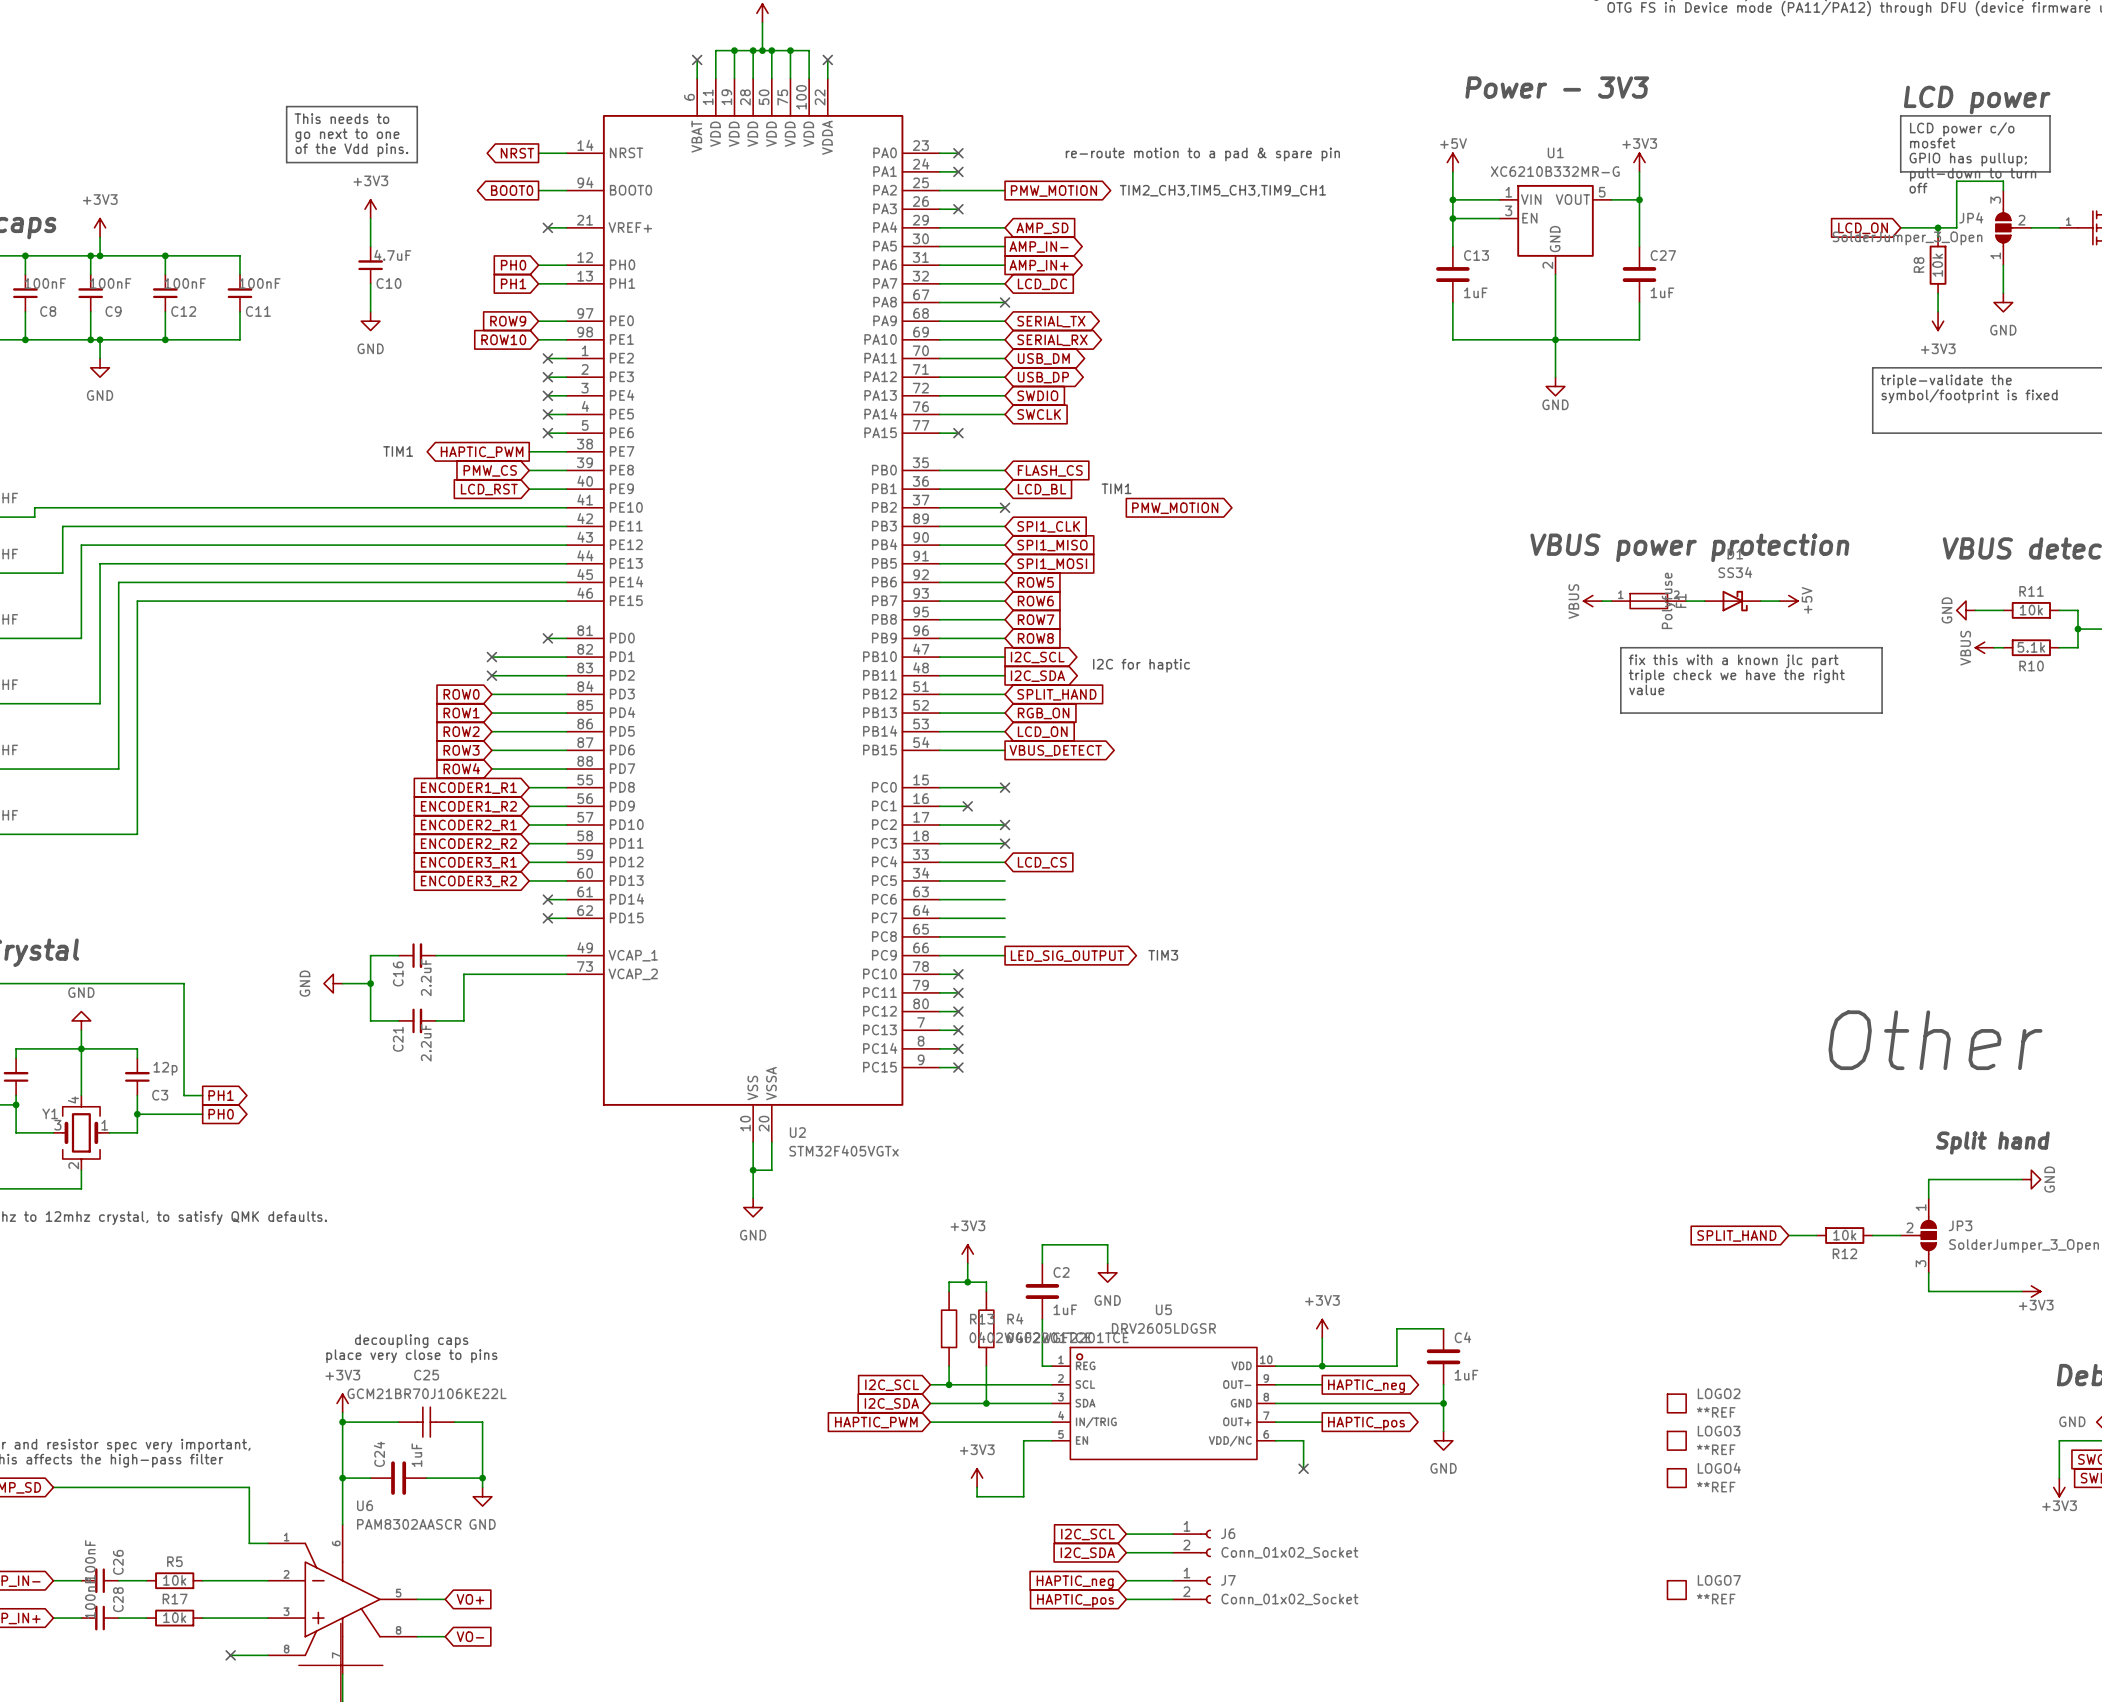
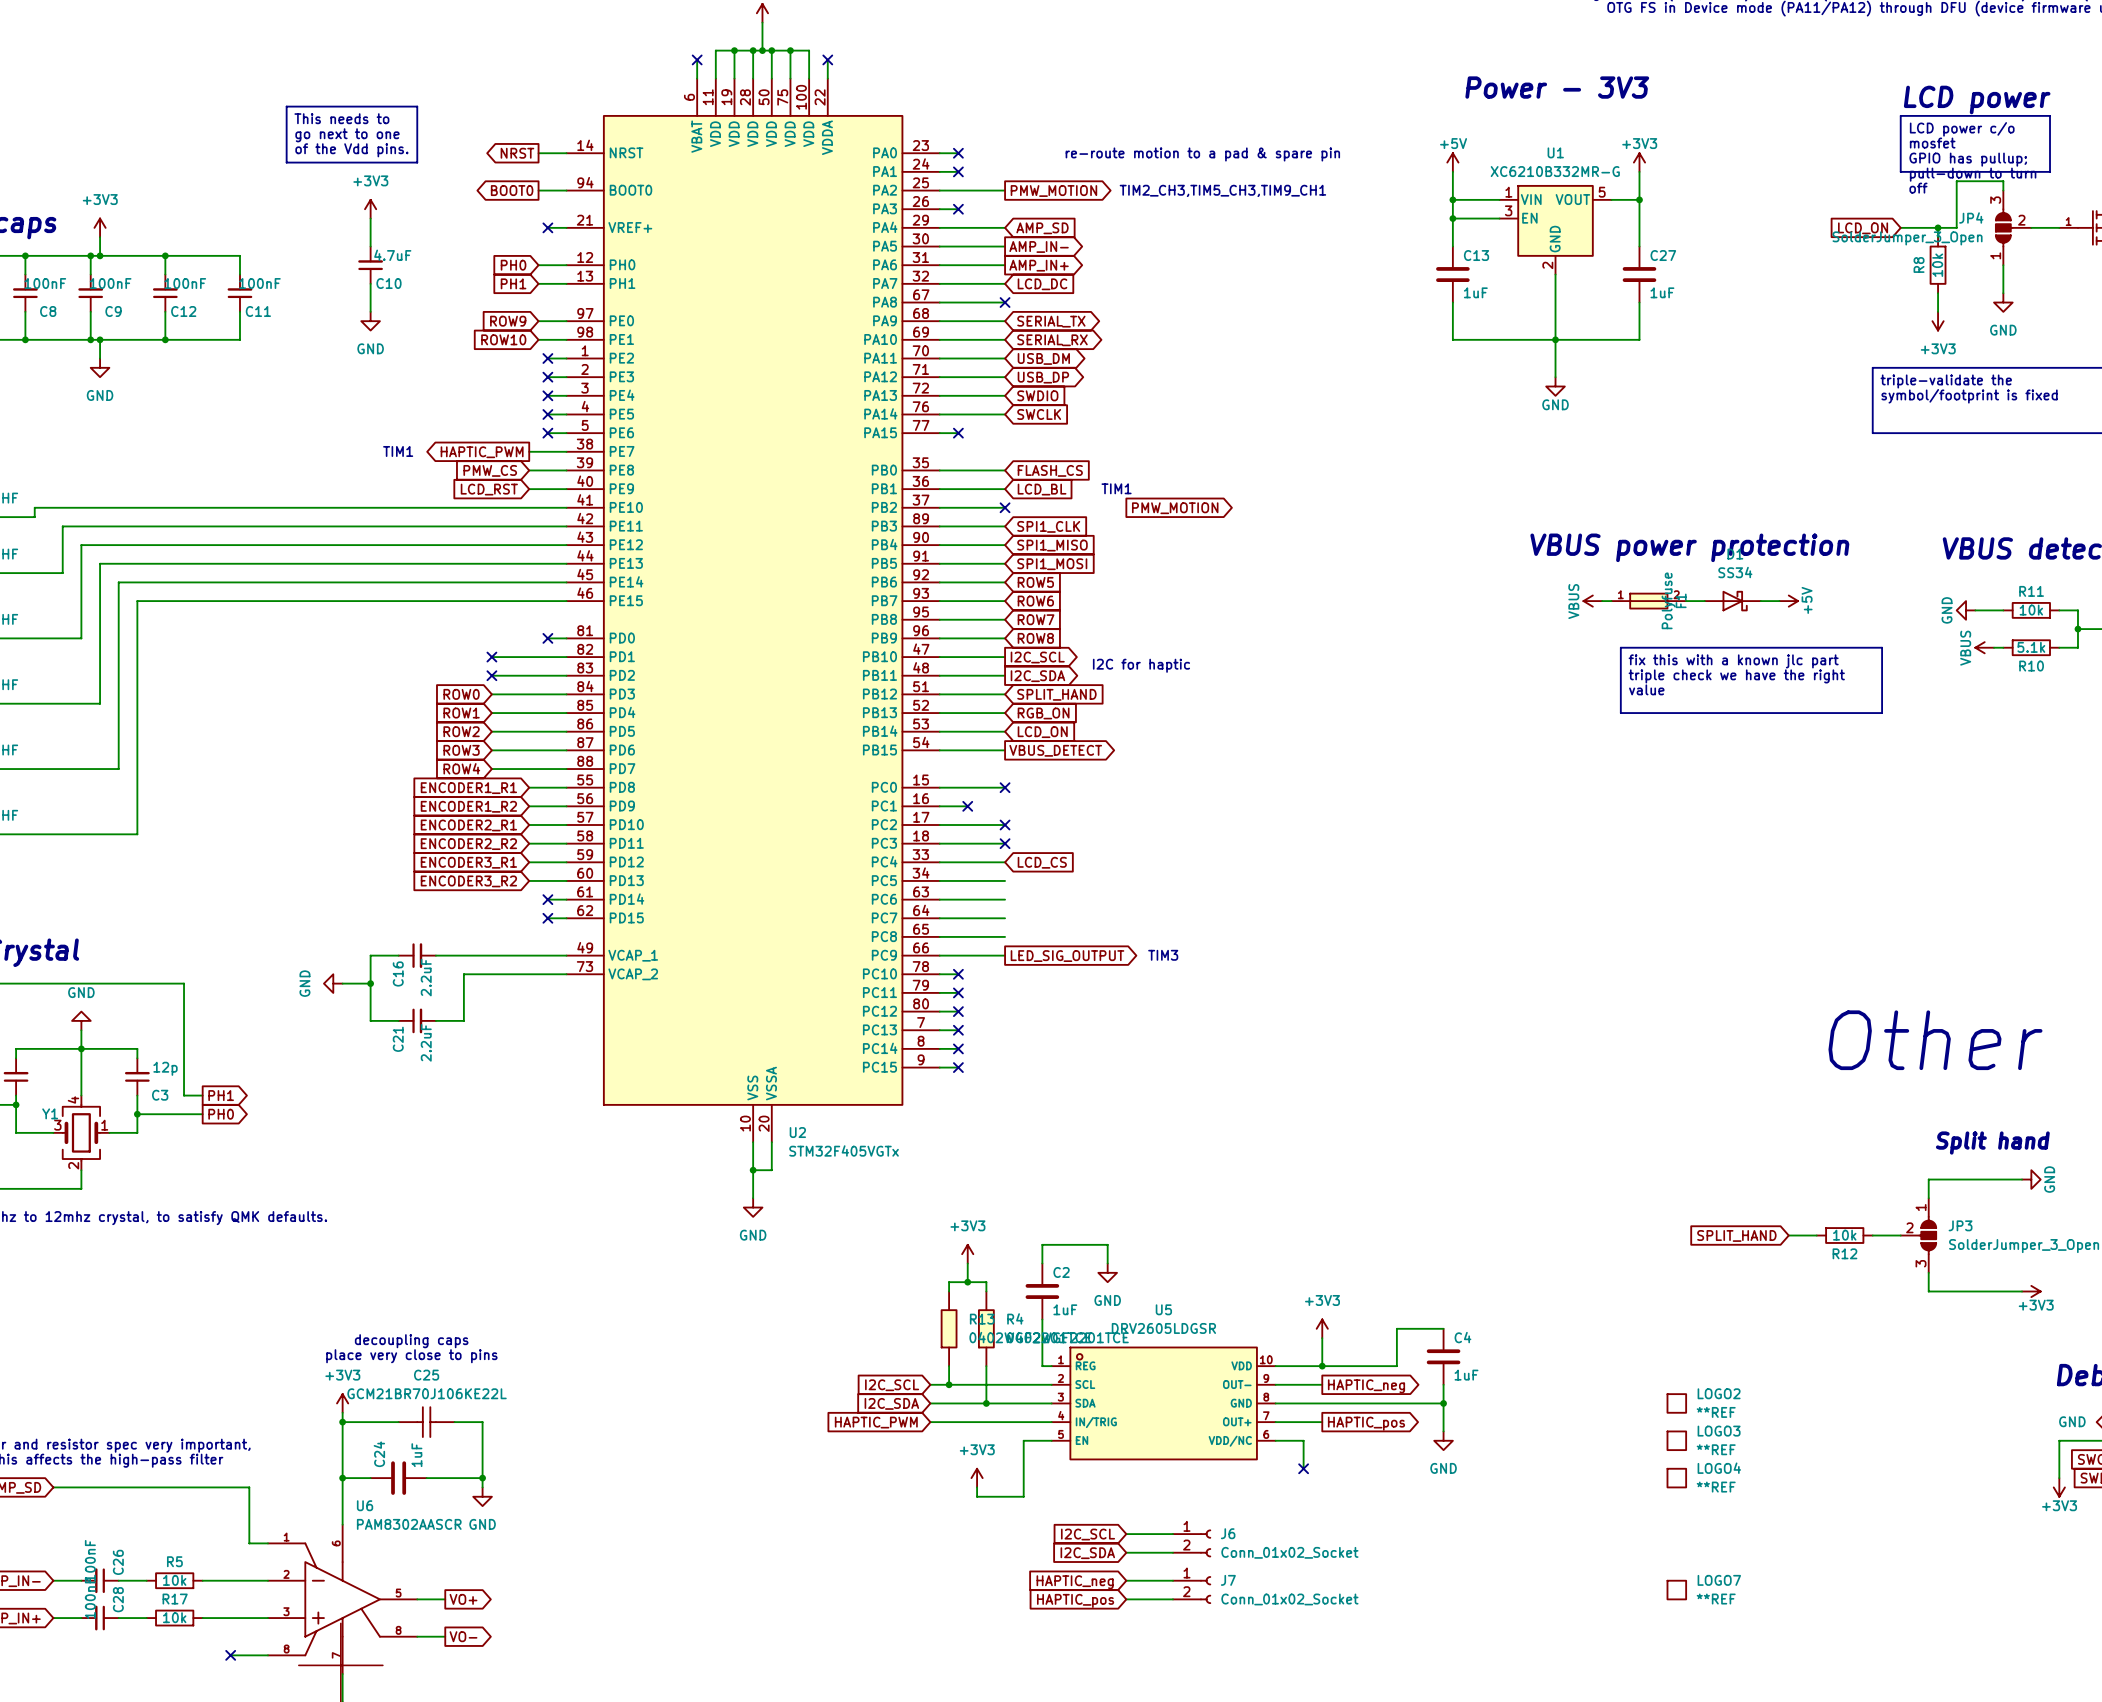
global label shape: input (470, 1599) -> output (463, 1599)
global label shape: input (470, 1636) -> output (463, 1636)

